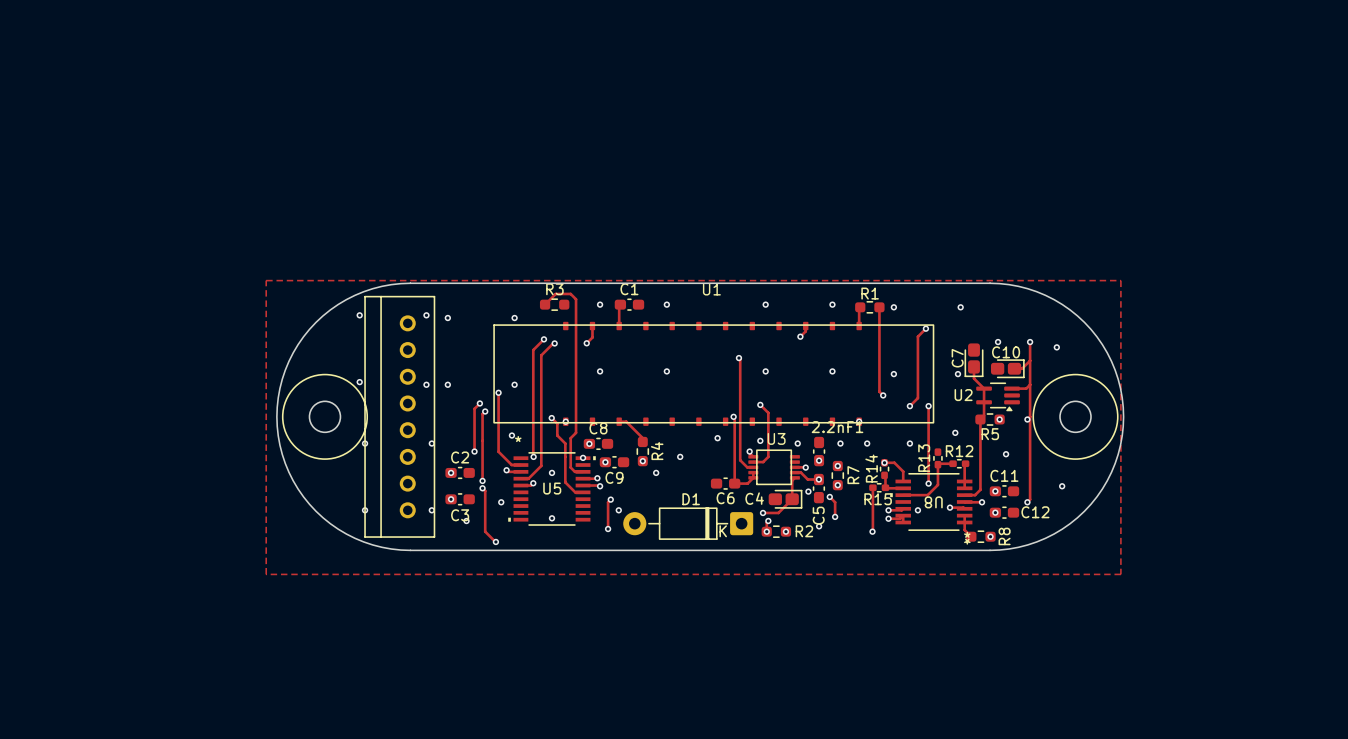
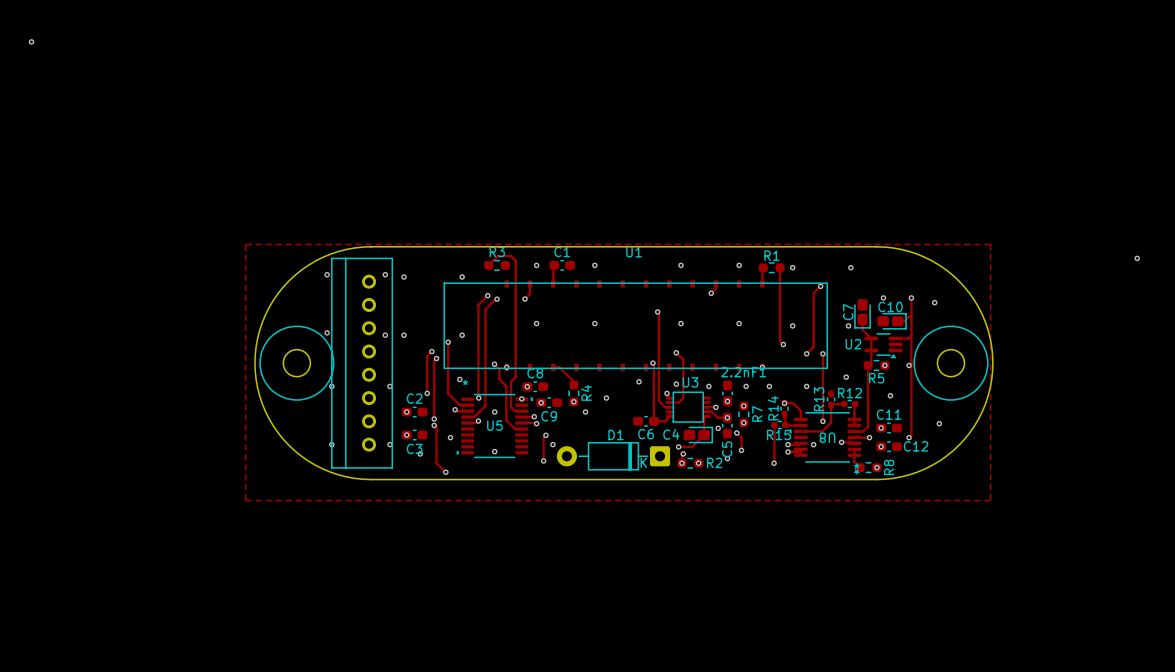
via: none -> (31, 41)
via: none -> (1137, 258)

